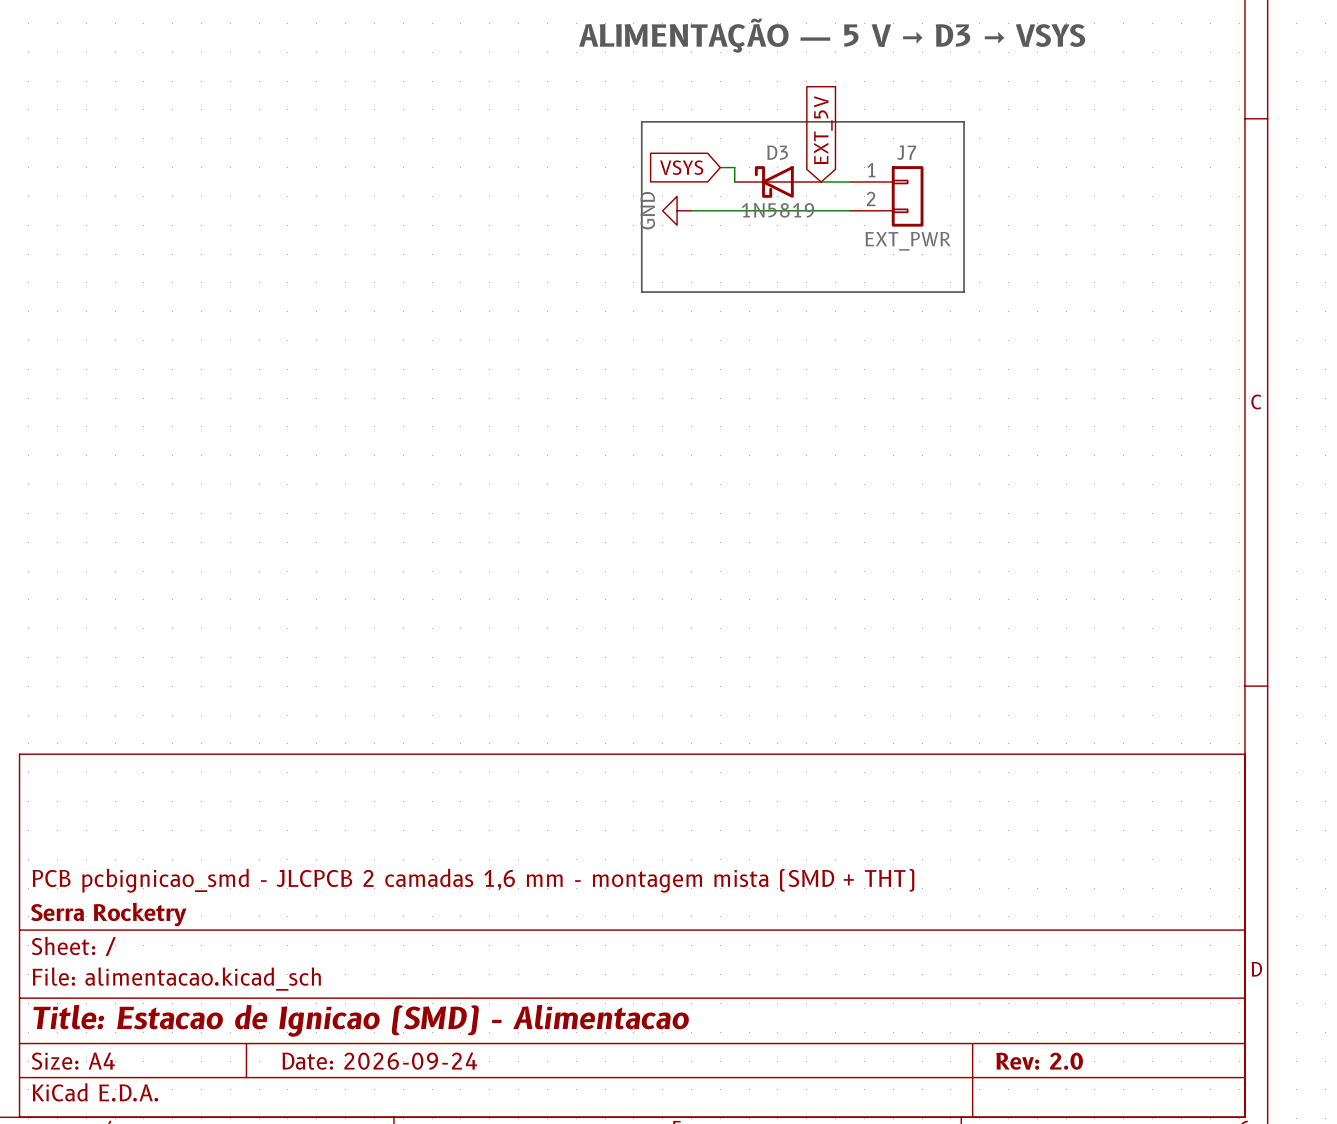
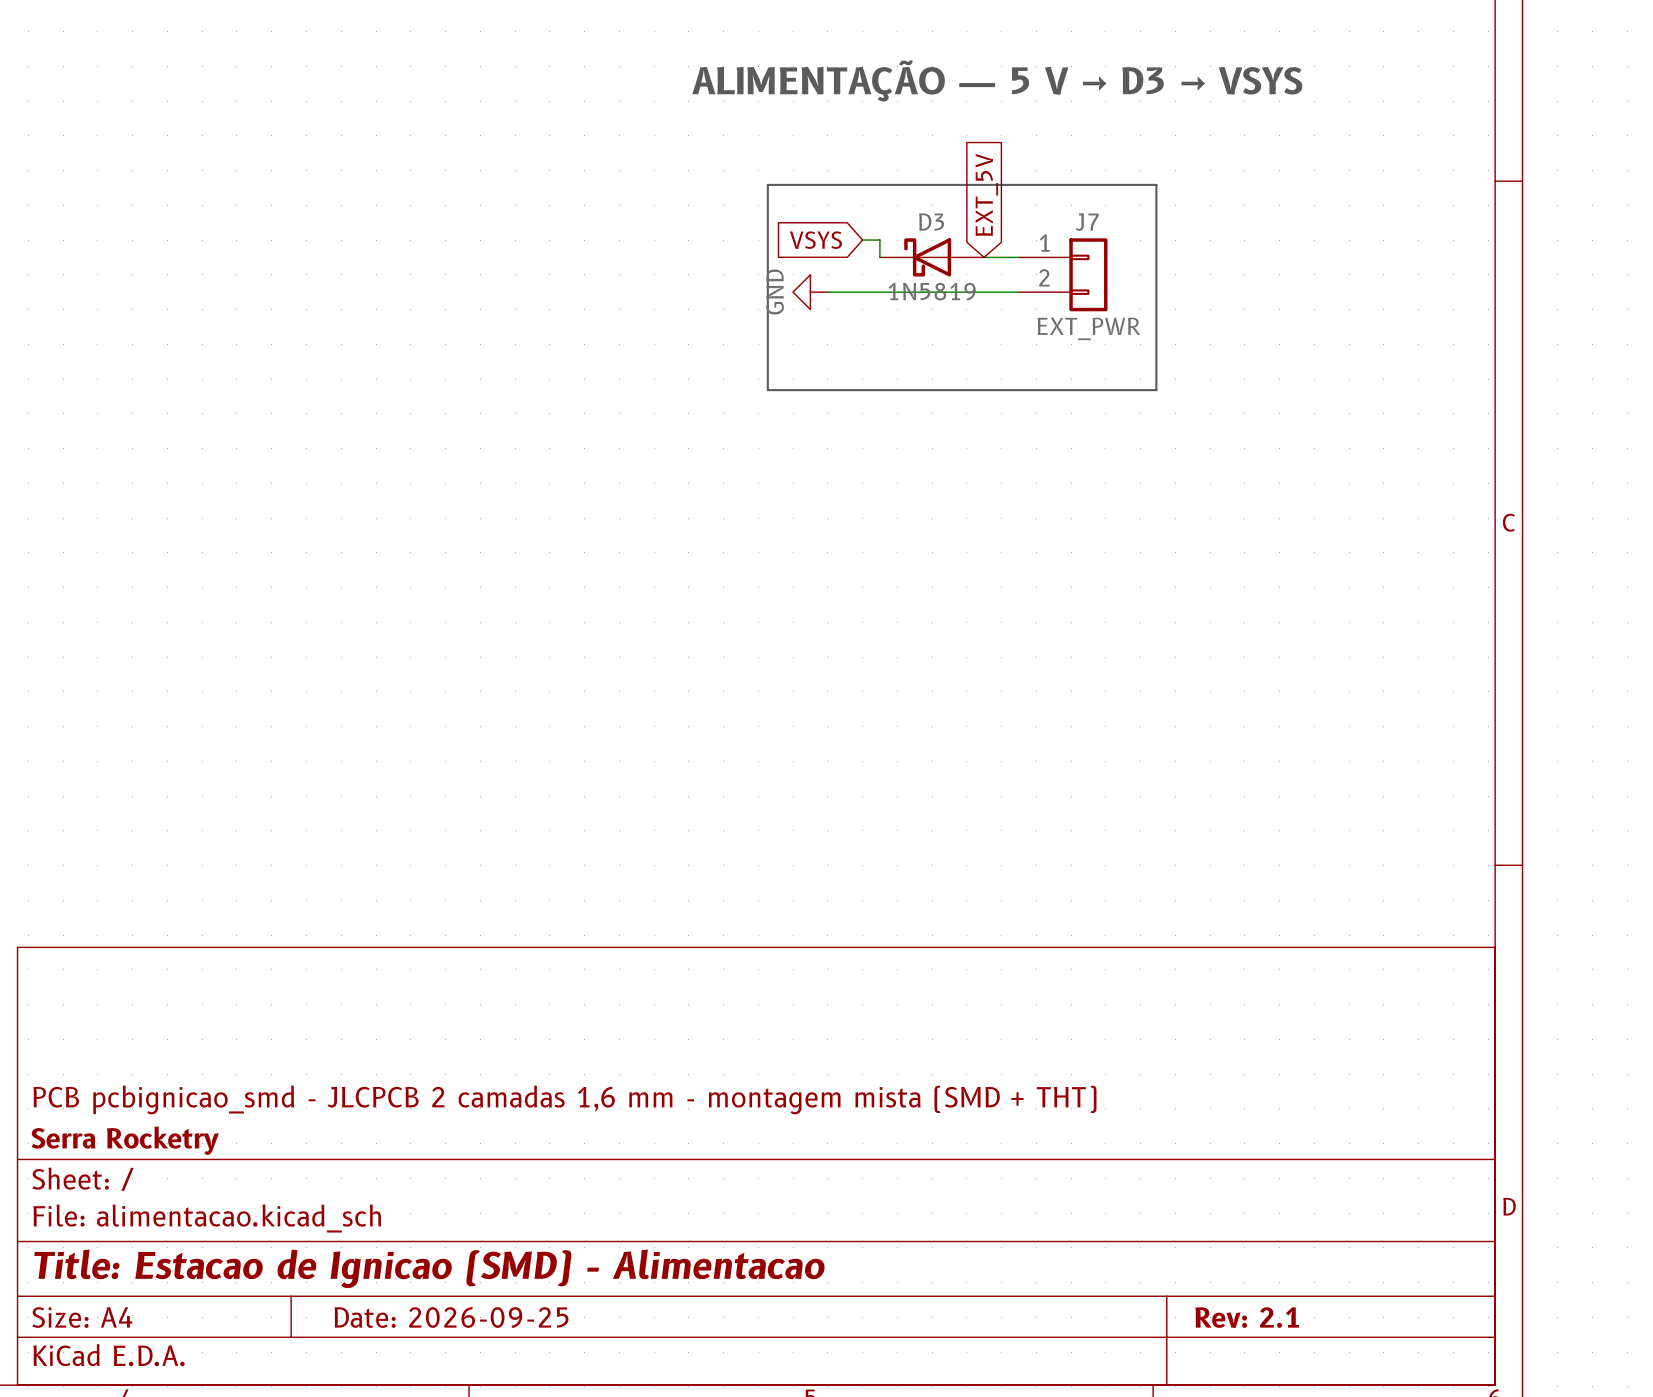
title block: Date: 2026-09-24 (379, 1061) -> Date: 2026-09-25 (451, 1317)
title block: Rev: 2.0 (1039, 1061) -> Rev: 2.1 (1247, 1317)

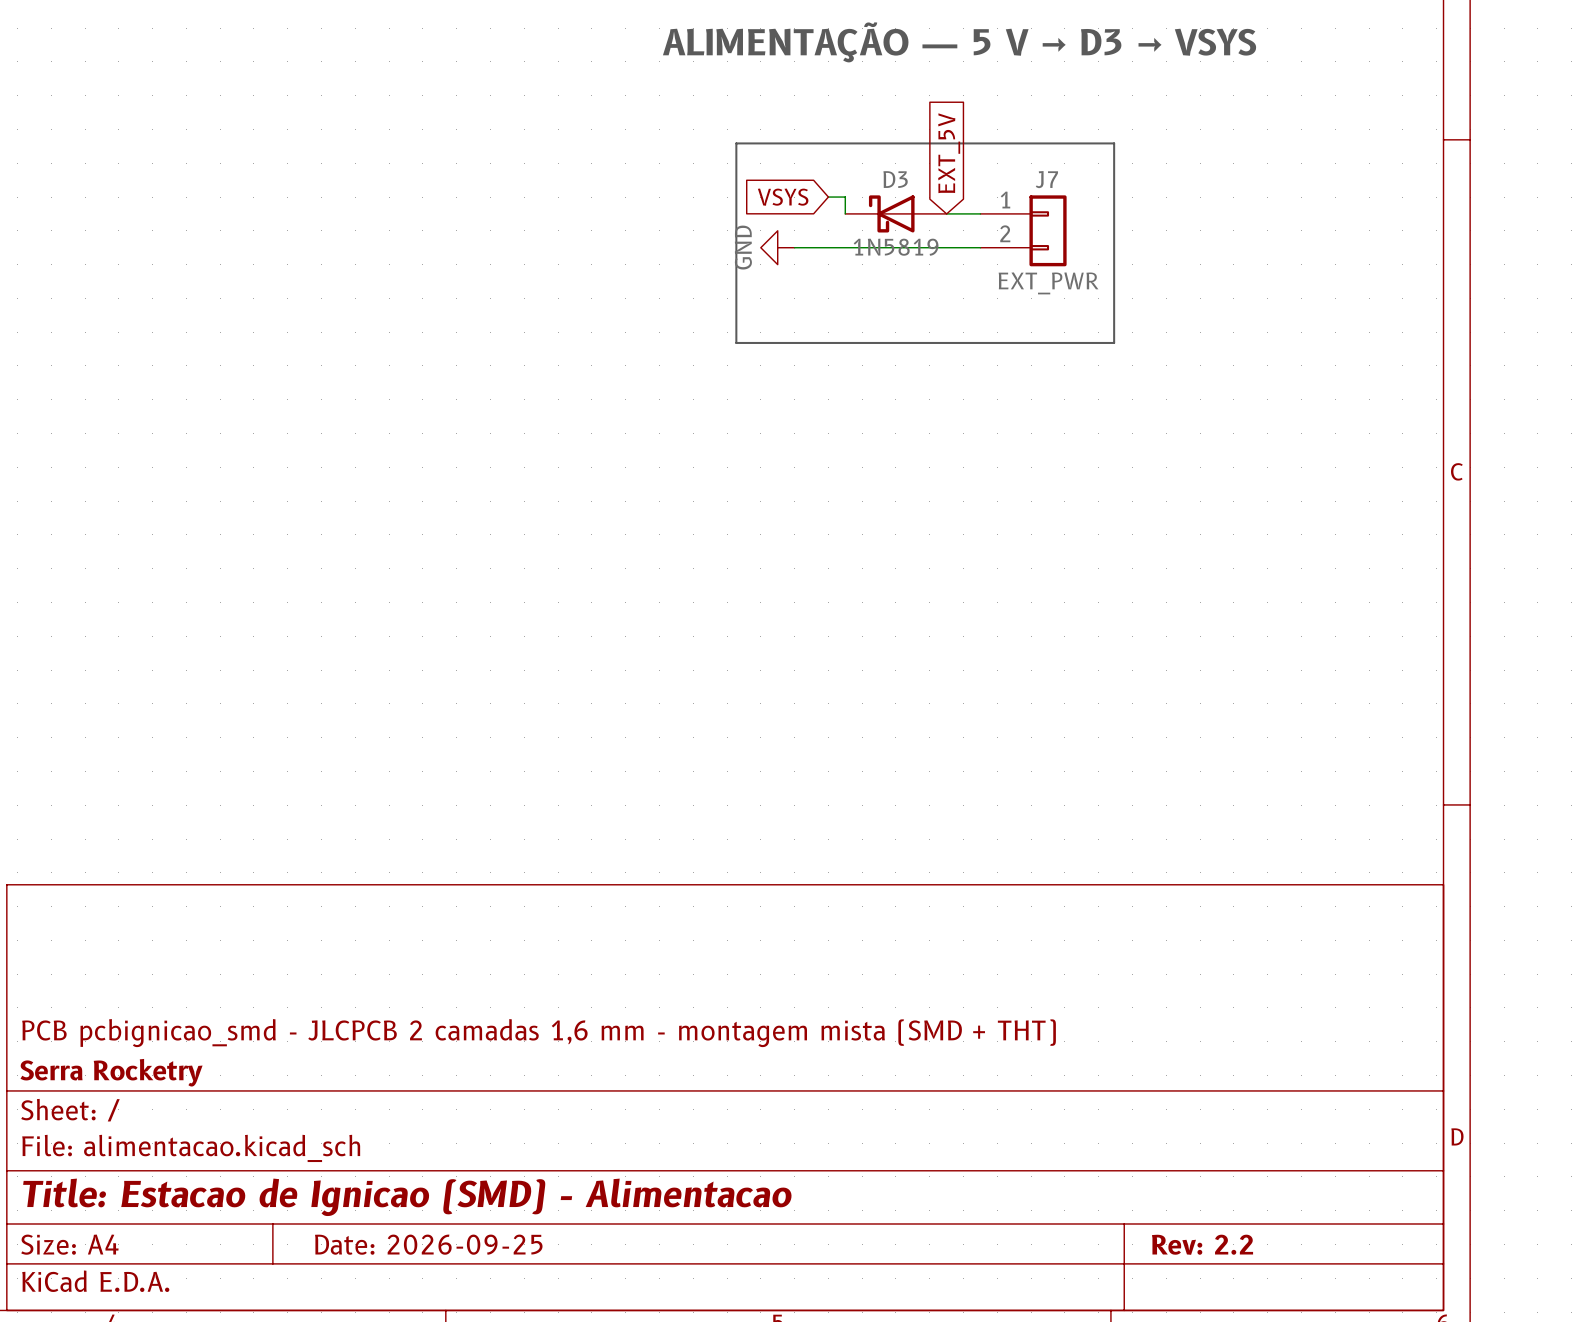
title block: Rev: 2.1 (1247, 1317) -> Rev: 2.2 (1202, 1244)

